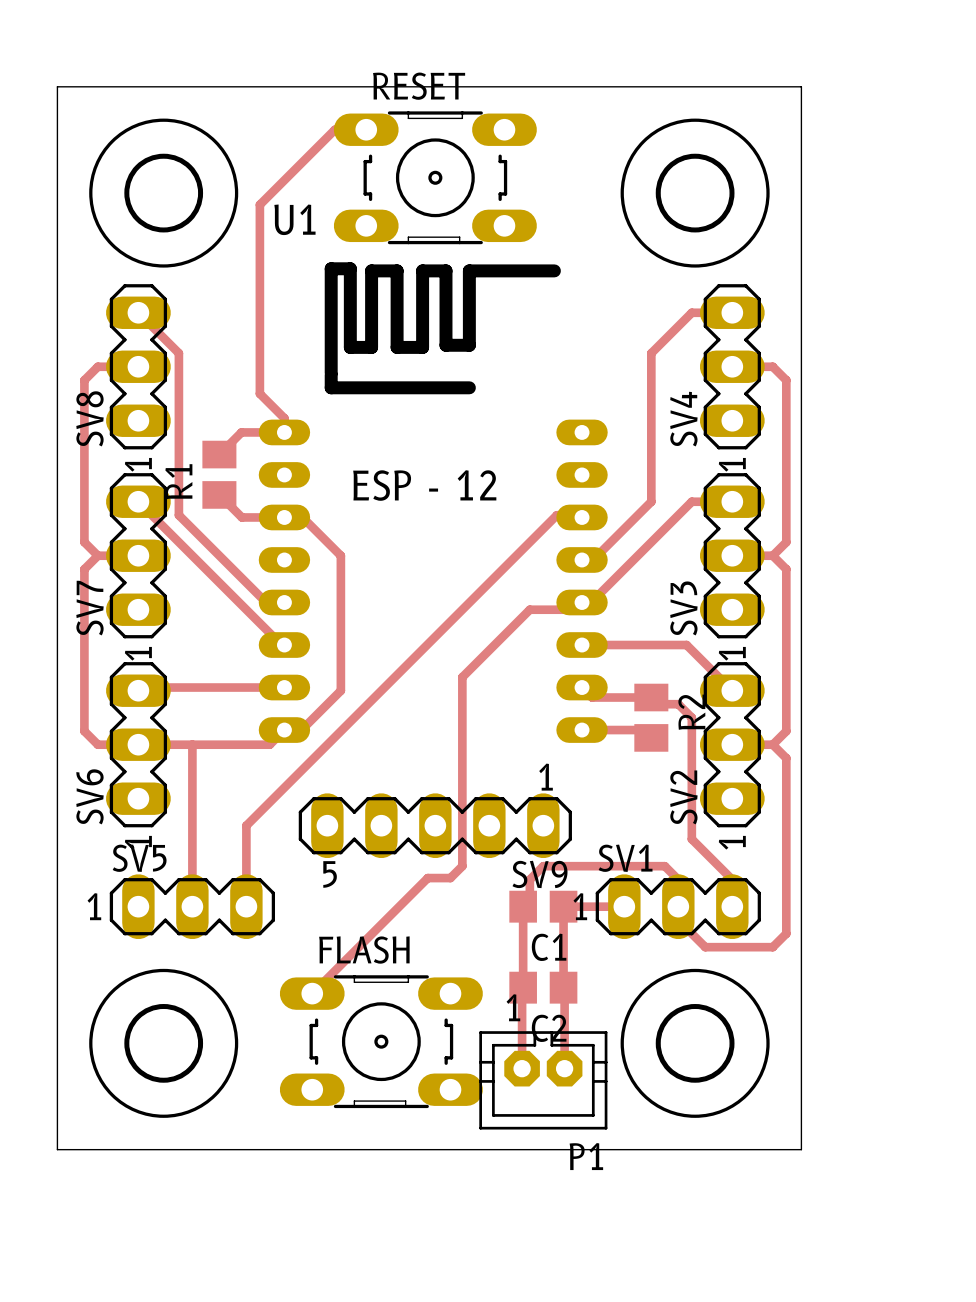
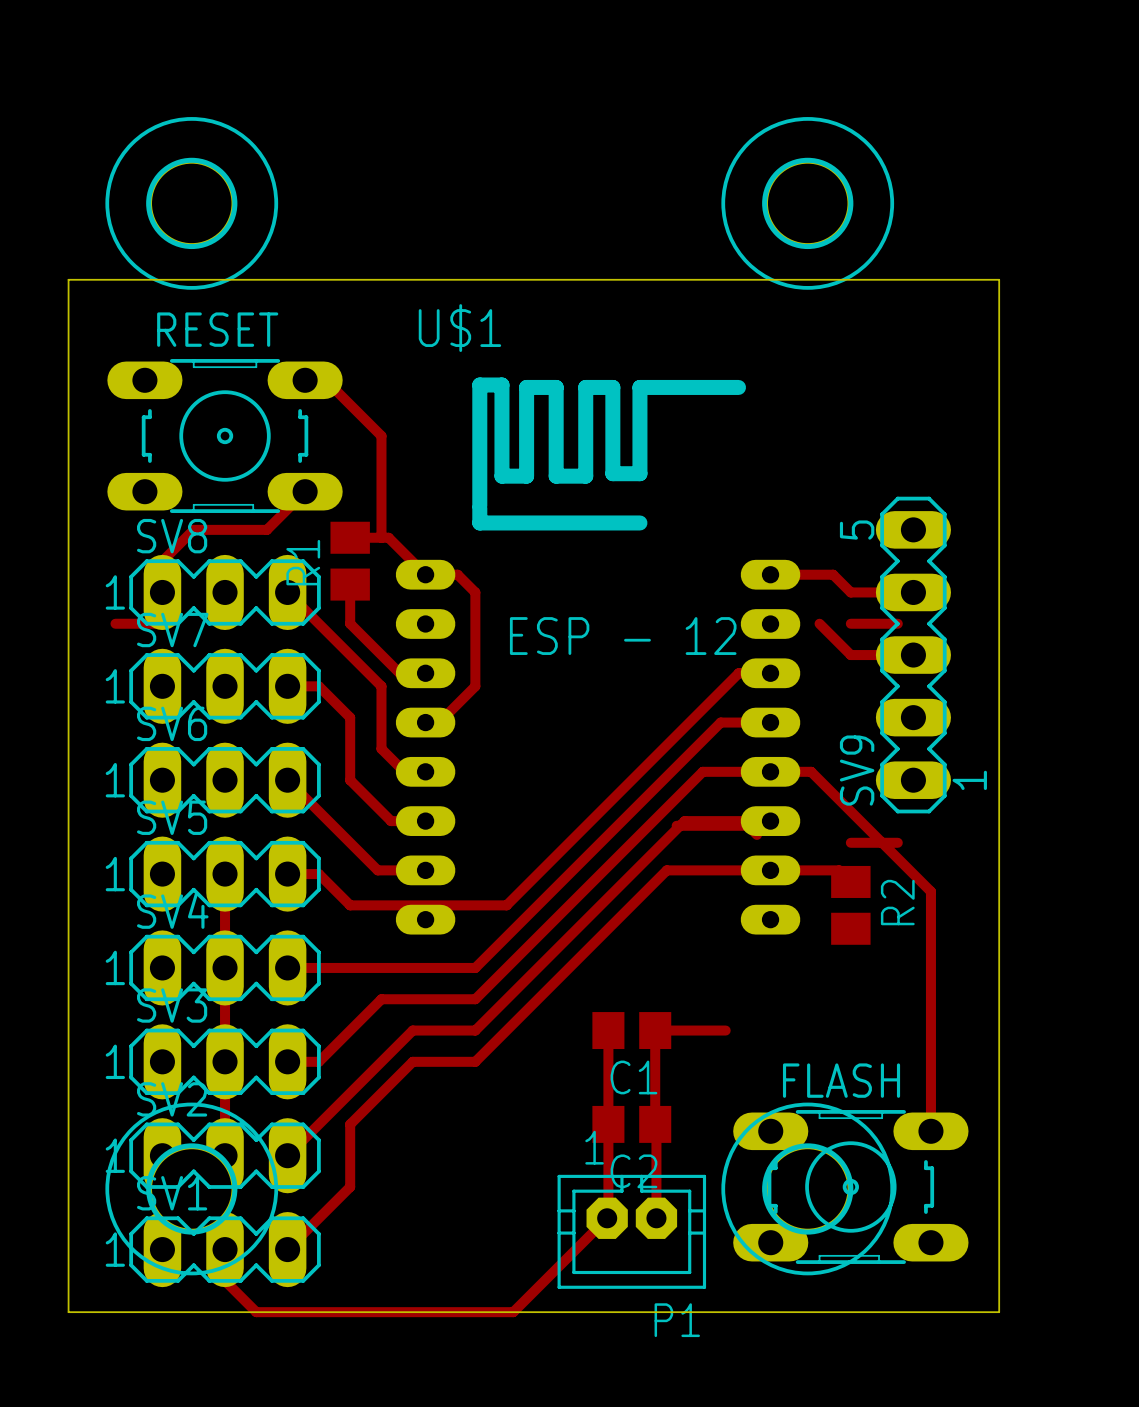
track: (366, 129) (334, 129) (259, 204) (259, 393) (284, 418) (284, 432) (241, 432) (219, 454) -> none
RESET position: (435, 177) -> (225, 436)
board edge: (57, 258) (57, 86) (801, 86) (801, 1149) -> (68, 279) (999, 279) (999, 1312) (930, 1312)
track: (138, 312) (178, 353) (178, 515) (266, 602) (284, 602) -> none
track: (732, 312) (691, 312) (651, 353) (651, 501) (593, 559) (582, 559) -> none
track: none -> (305, 380) (325, 380) (381, 436) (381, 537)
track: (138, 366) (97, 366) (84, 380) (84, 542) (97, 555) (84, 569) (84, 731) (97, 744) (269, 744) (284, 730) (301, 730) (340, 690) (340, 555) (300, 515) (286, 515) (284, 517) (241, 517) (219, 494) -> none
SV8 rotation: 0° (138, 366) -> 90° clockwise (225, 592)
SV8 position: (138, 366) -> (225, 592)
track: (732, 366) (772, 366) (786, 380) (786, 542) (772, 555) (786, 569) (786, 731) (772, 744) (786, 758) (786, 933) (772, 947) (705, 947) (678, 920) (678, 879) (664, 866) (543, 866) (529, 879) (529, 899) (523, 906) -> none
SV4 rotation: 0° (732, 366) -> 90° clockwise (225, 967)
SV4 position: (732, 366) -> (225, 967)
track: none -> (305, 491) (266, 529) (193, 529) (162, 561) (162, 592)
R1 position: (219, 474) -> (350, 561)
track: none -> (350, 537) (388, 537) (425, 574) (457, 574) (475, 592) (475, 686) (439, 722) (425, 722)
track: (138, 501) (281, 645) (284, 645) -> none
track: (732, 501) (691, 501) (591, 602) (582, 602) (574, 609) (529, 609) (462, 677) (462, 866) (450, 878) (427, 878) (312, 993) -> none
U1: (433, 502) -> none
track: none -> (770, 574) (833, 574) (850, 592) (913, 592)
track: (582, 517) (579, 515) (556, 515) (246, 825) (246, 906) -> none
track: none -> (350, 584) (350, 623) (399, 673) (425, 673)
track: none -> (287, 592) (381, 686) (381, 748) (404, 771) (425, 771)
SV7 rotation: 0° (138, 555) -> 90° clockwise (225, 686)
track: none -> (819, 623) (850, 655) (913, 655)
SV3 rotation: 0° (732, 555) -> 90° clockwise (225, 1061)
SV3 position: (732, 555) -> (225, 1061)
U$1: none -> (598, 656)
track: none -> (770, 673) (738, 673) (506, 905) (350, 905) (318, 874) (287, 874)
track: none -> (287, 686) (318, 686) (350, 717) (350, 780) (391, 821) (425, 821)
track: none -> (770, 722) (720, 722) (475, 967) (287, 967)
track: (582, 645) (686, 645) (732, 690) -> none
track: (284, 687) (141, 687) (138, 690) -> none
track: (582, 687) (592, 697) (651, 697) (658, 704) (678, 704) (691, 717) (691, 839) (732, 879) (732, 906) -> none
track: none -> (287, 780) (377, 870) (425, 870)
R2 position: (651, 717) -> (850, 905)
track: none -> (770, 821) (684, 821) (475, 1030) (412, 1030) (287, 1155)
SV6 rotation: 0° (138, 744) -> 90° clockwise (225, 780)
SV2 rotation: 0° (732, 744) -> 90° clockwise (225, 1155)
SV2 position: (732, 744) -> (225, 1155)
track: none -> (850, 881) (839, 870) (666, 870) (475, 1061) (412, 1061) (350, 1124) (350, 1186) (287, 1249)
SV9 footprint: [298, 793, 572, 859] -> [875, 496, 951, 814]
SV9 name position: SV9 (540, 874) -> SV9 (857, 770)
SV5 position: (192, 906) -> (225, 874)
SV1 position: (678, 906) -> (225, 1249)
track: none -> (287, 1061) (318, 1061) (381, 999) (475, 999) (702, 771) (811, 771) (930, 891) (930, 1131)
track: (523, 987) (522, 1068) -> (608, 1124) (608, 1217) (513, 1312) (256, 1312) (225, 1280) (225, 1030)
FLASH position: (381, 1041) -> (850, 1186)

